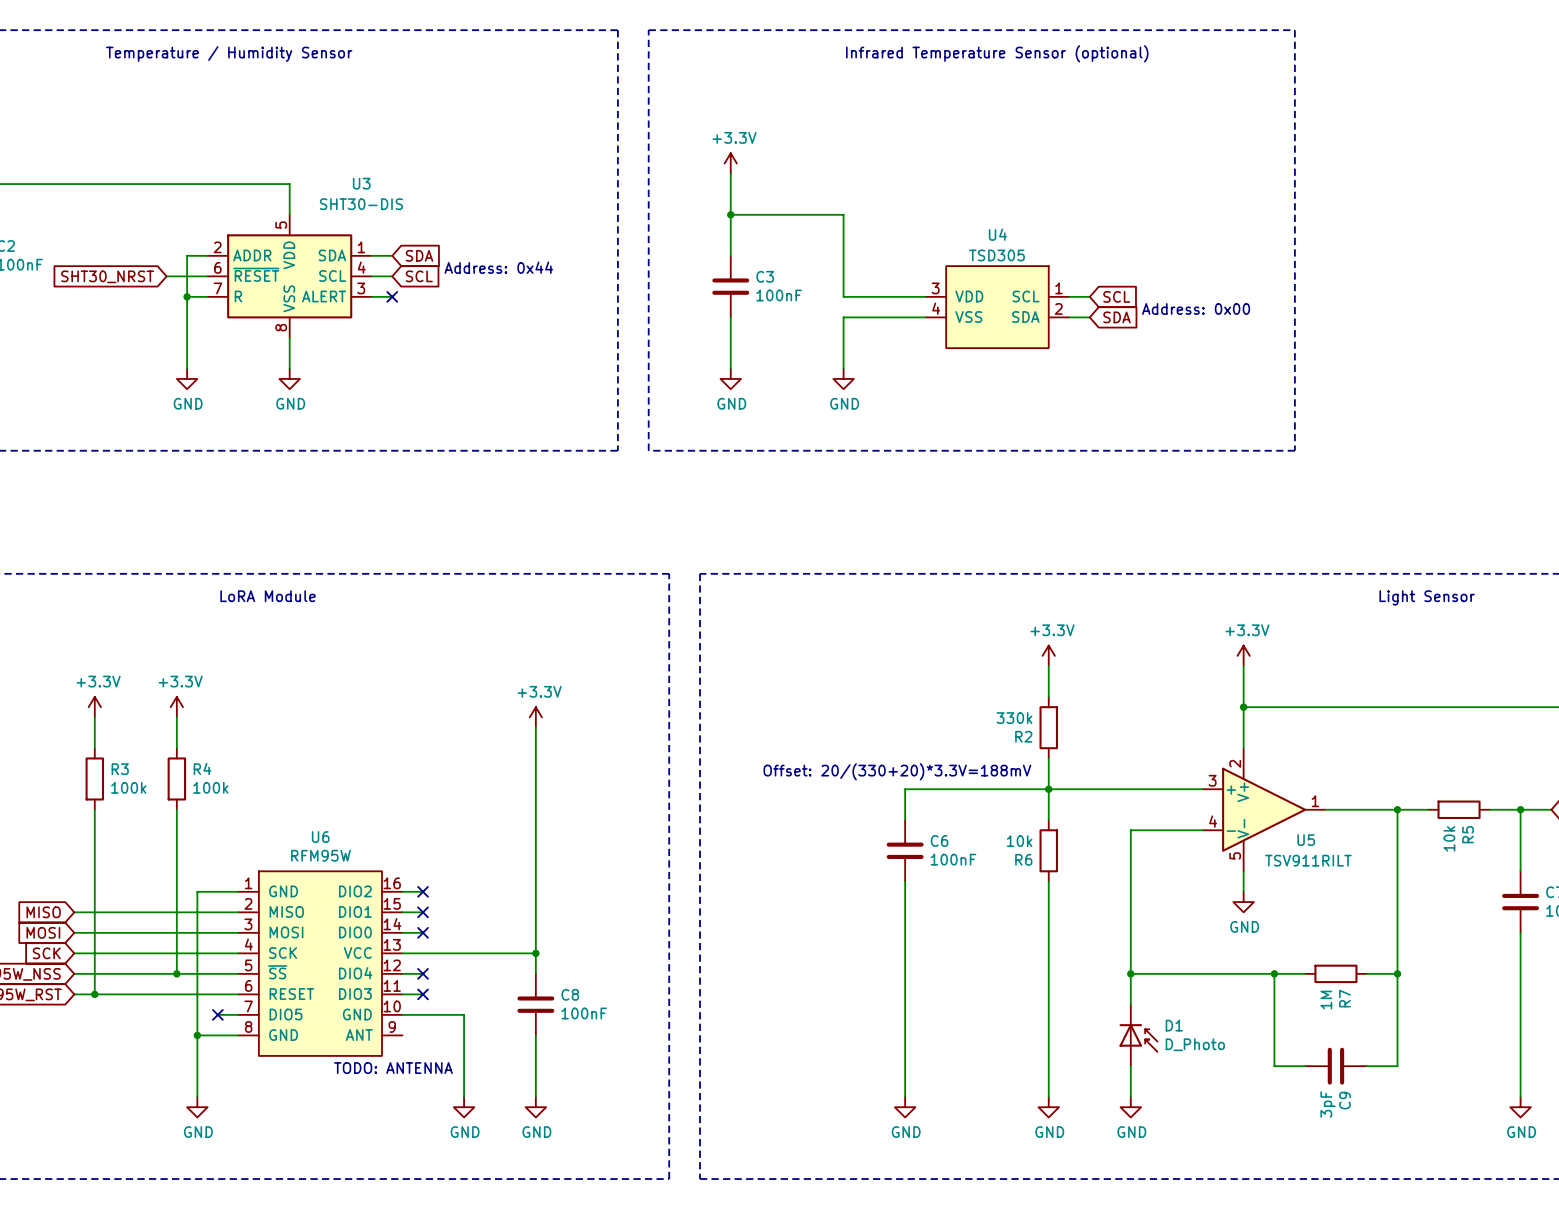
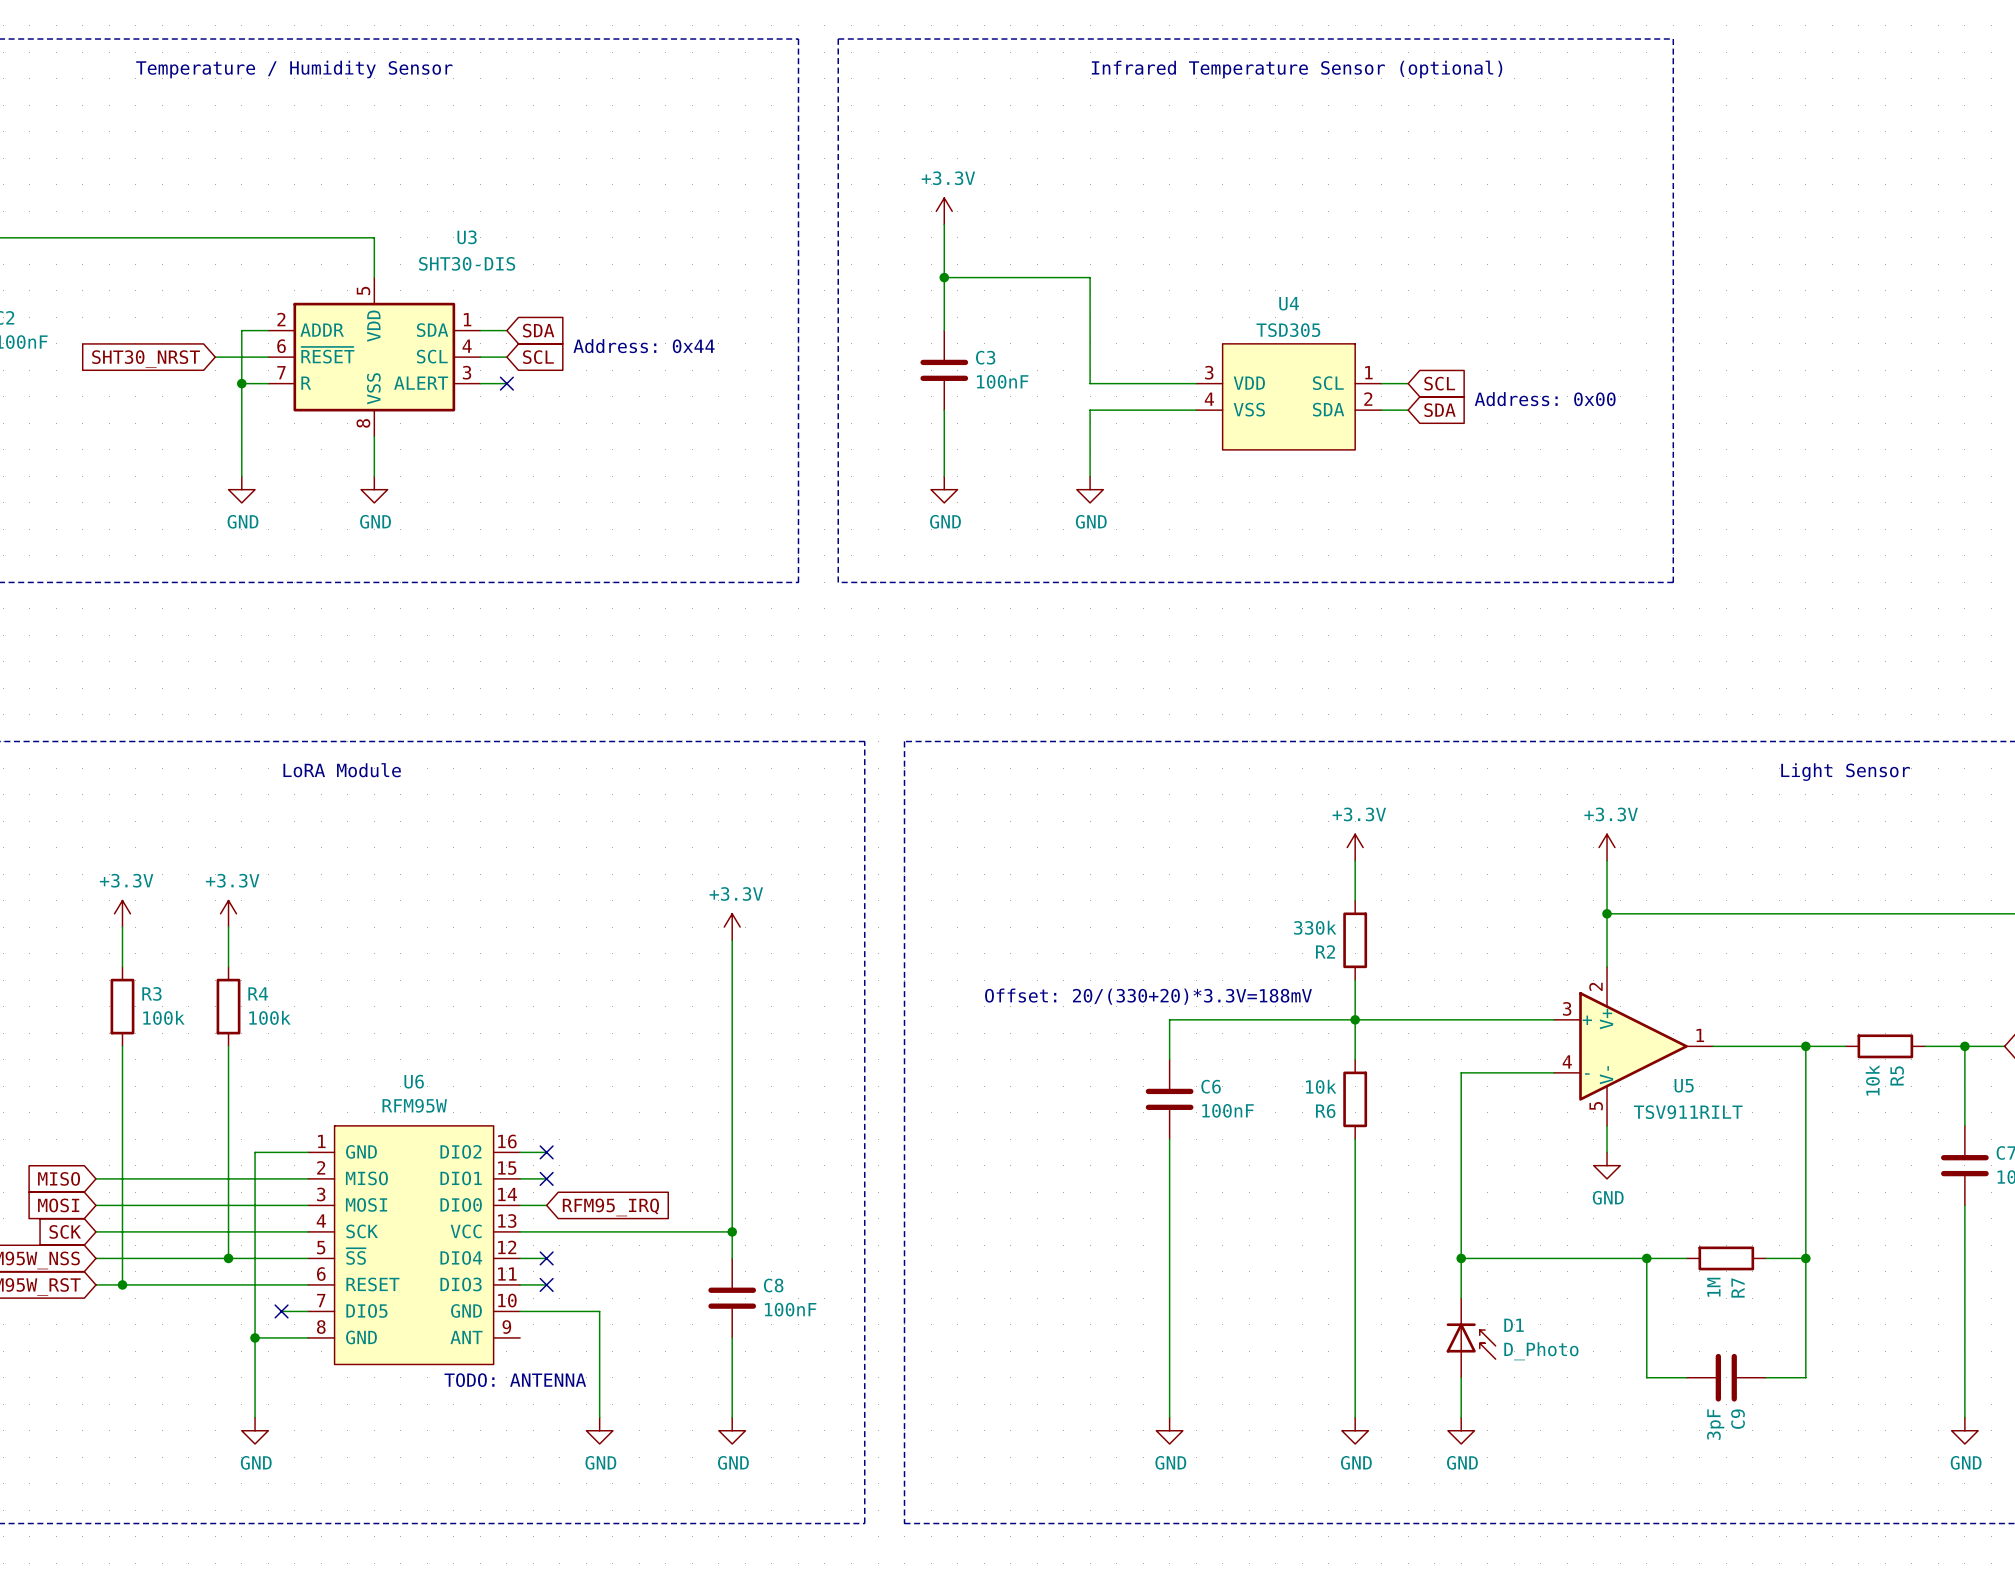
power symbol position: +3.3V (535, 717) -> +3.3V (732, 927)
wire: (535, 727) (535, 973) -> (732, 940) (732, 1258)
no-connect mark: (423, 932) -> none
global label: none -> RFM95_IRQ (610, 1207)
wire: none -> (692, 1231) (732, 1231)
junction position: (535, 953) -> (732, 1231)
C8 position: (535, 1004) -> (732, 1298)
wire: (535, 1035) (535, 1096) -> (732, 1337) (732, 1417)
power symbol position: GND (535, 1107) -> GND (732, 1430)

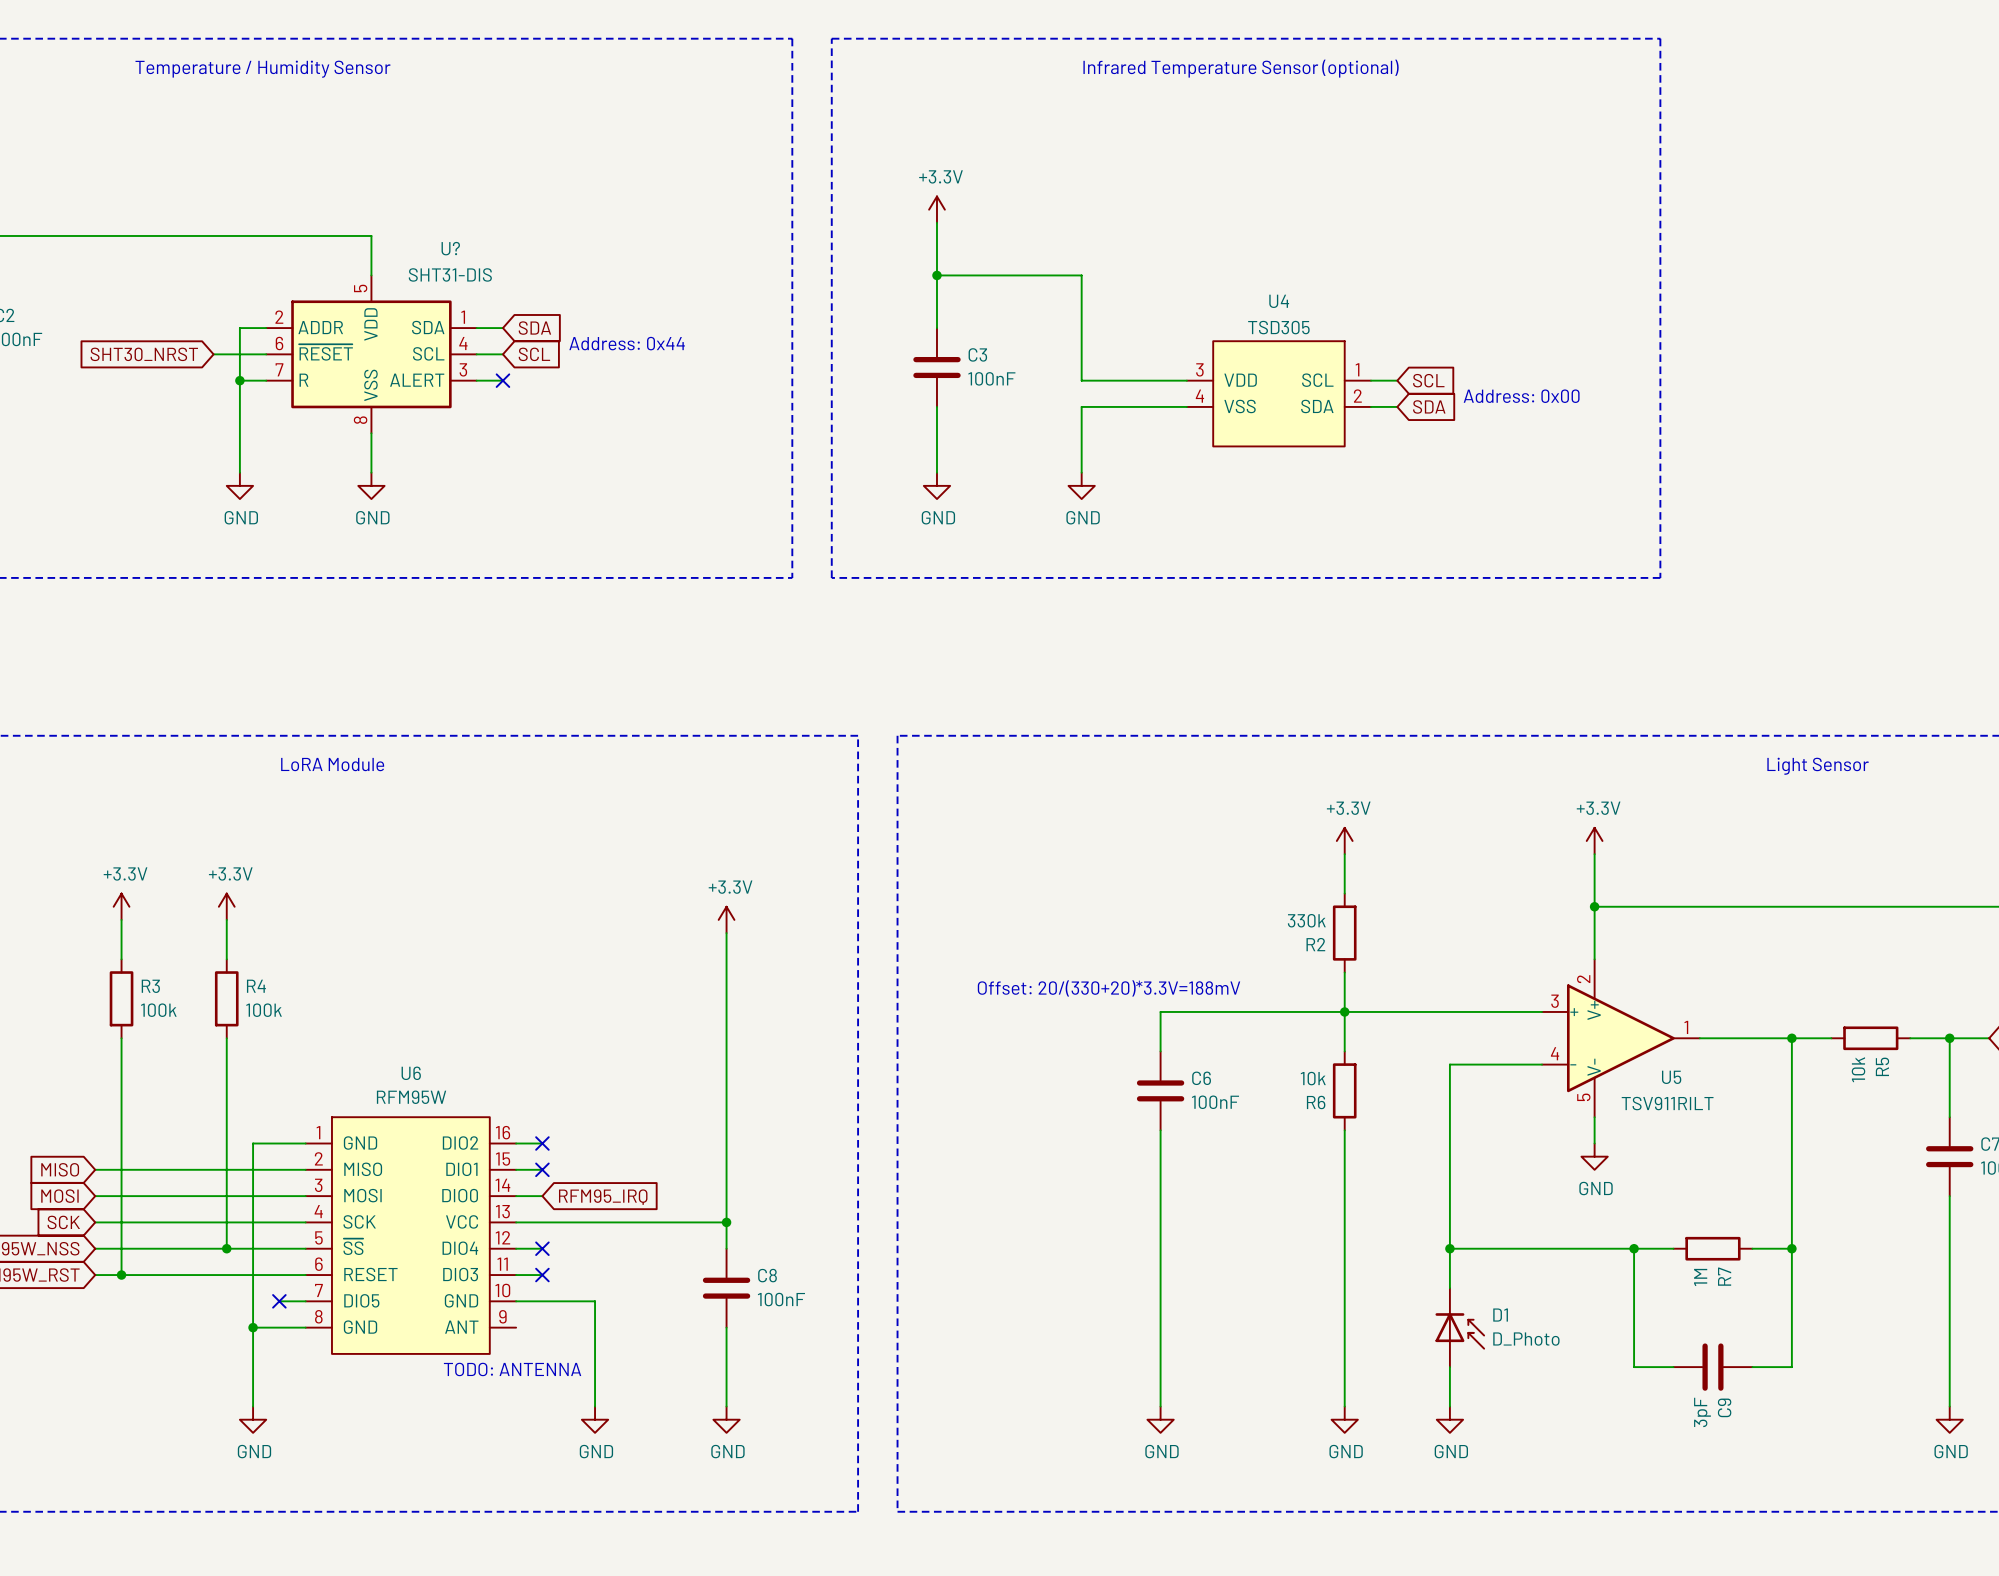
U3 name: U3 (467, 237) -> U? (450, 248)
U3 value: SHT30-DIS (467, 263) -> SHT31-DIS (450, 274)

